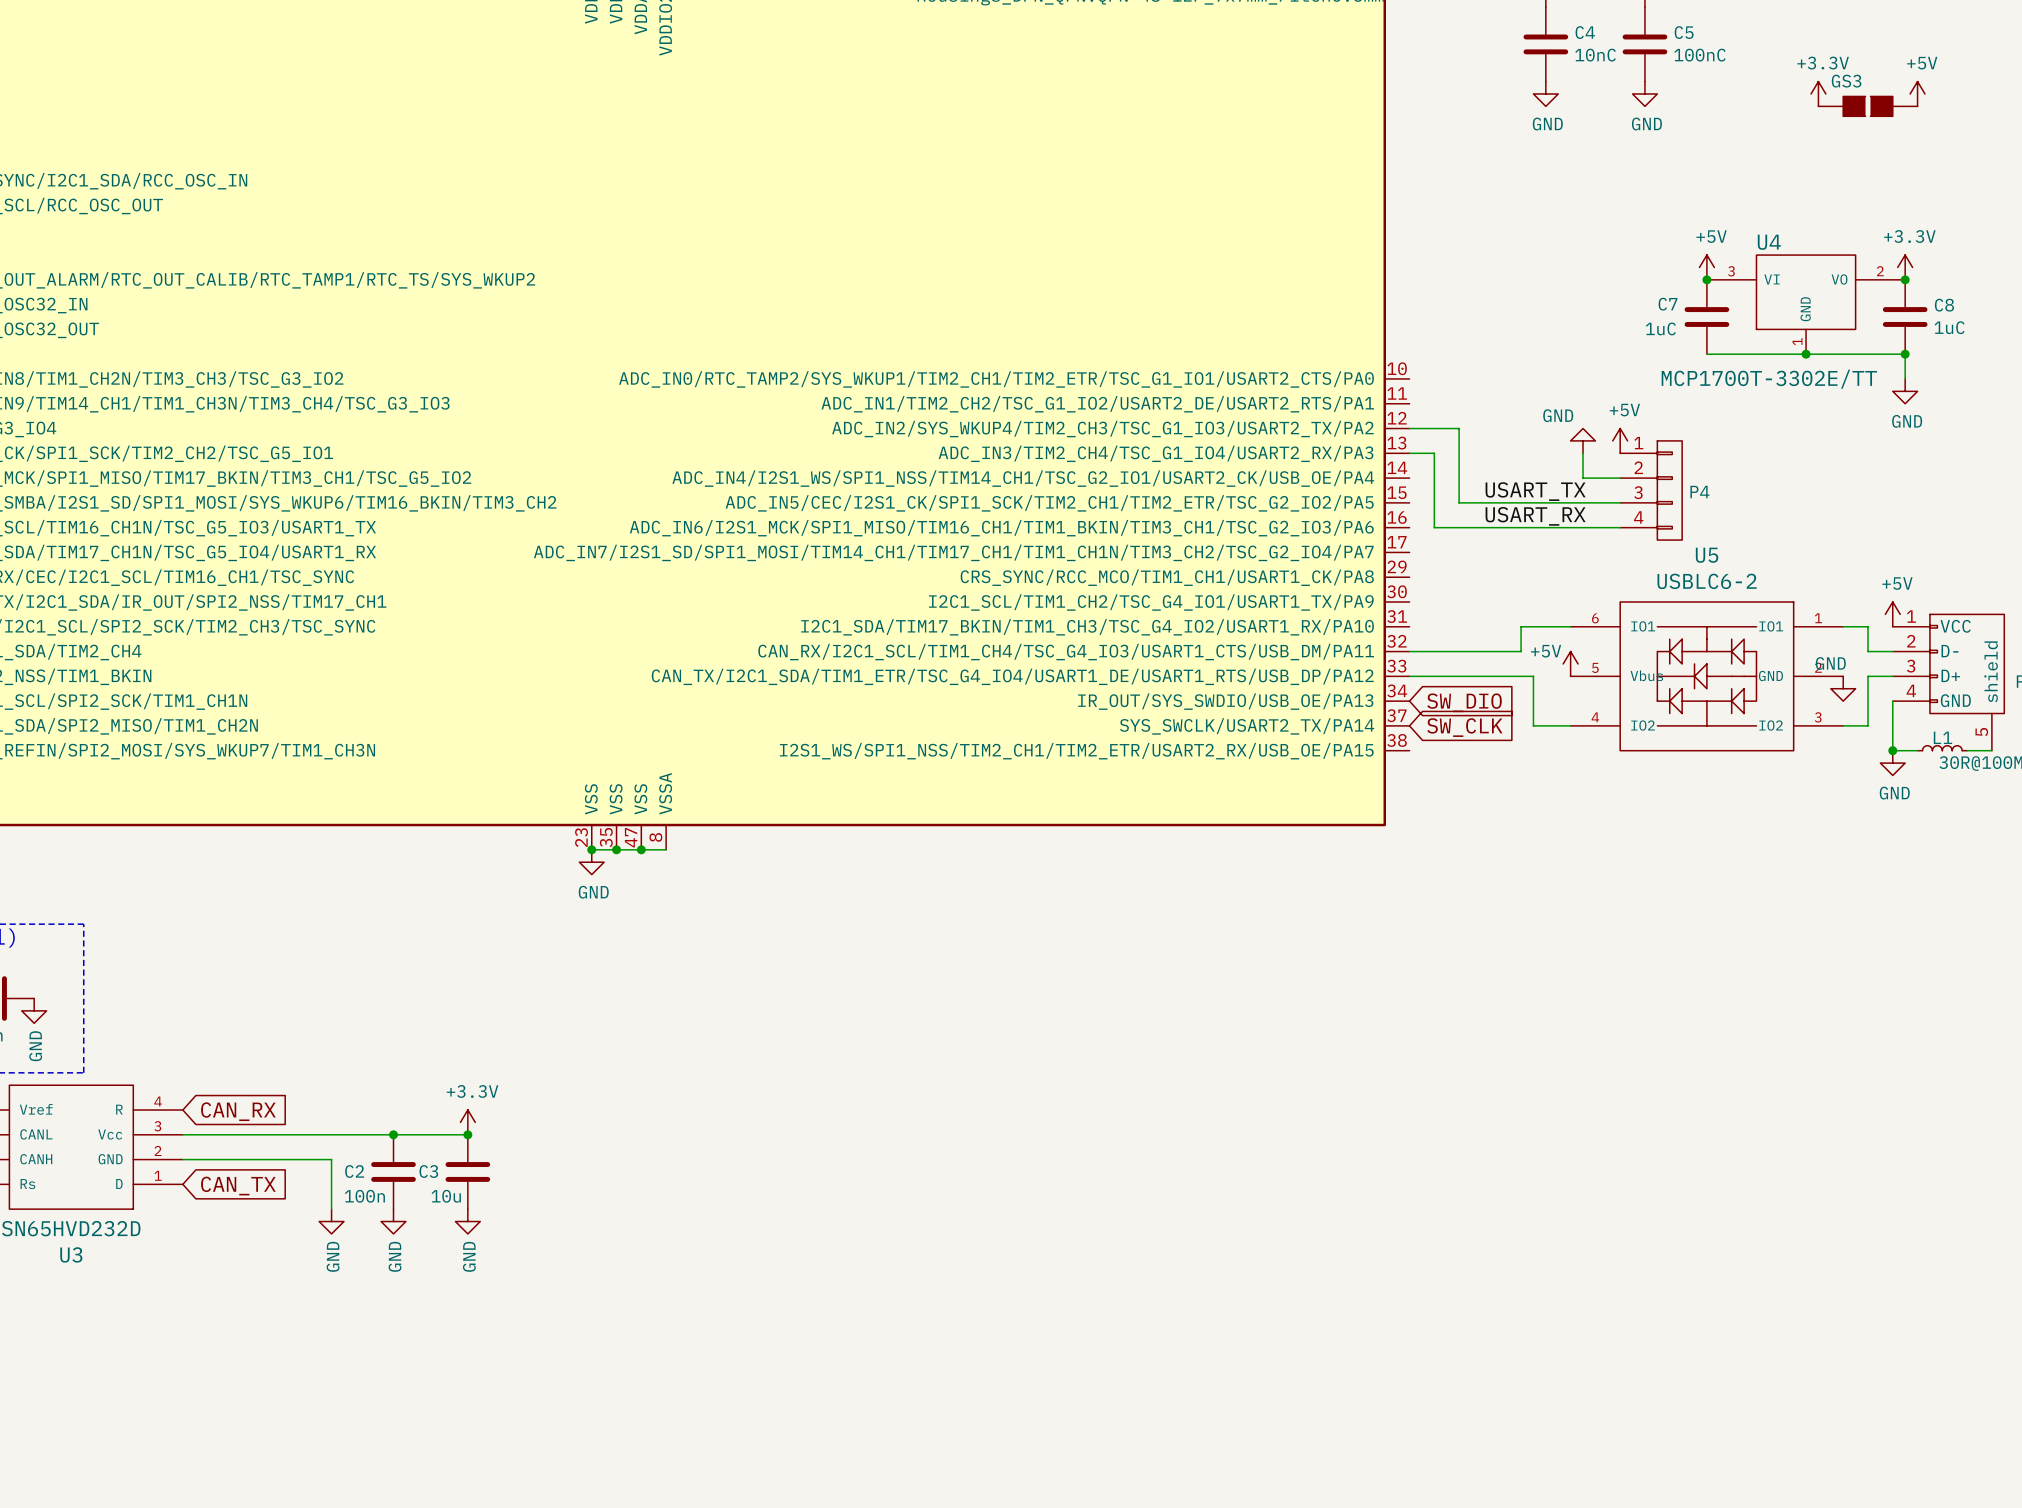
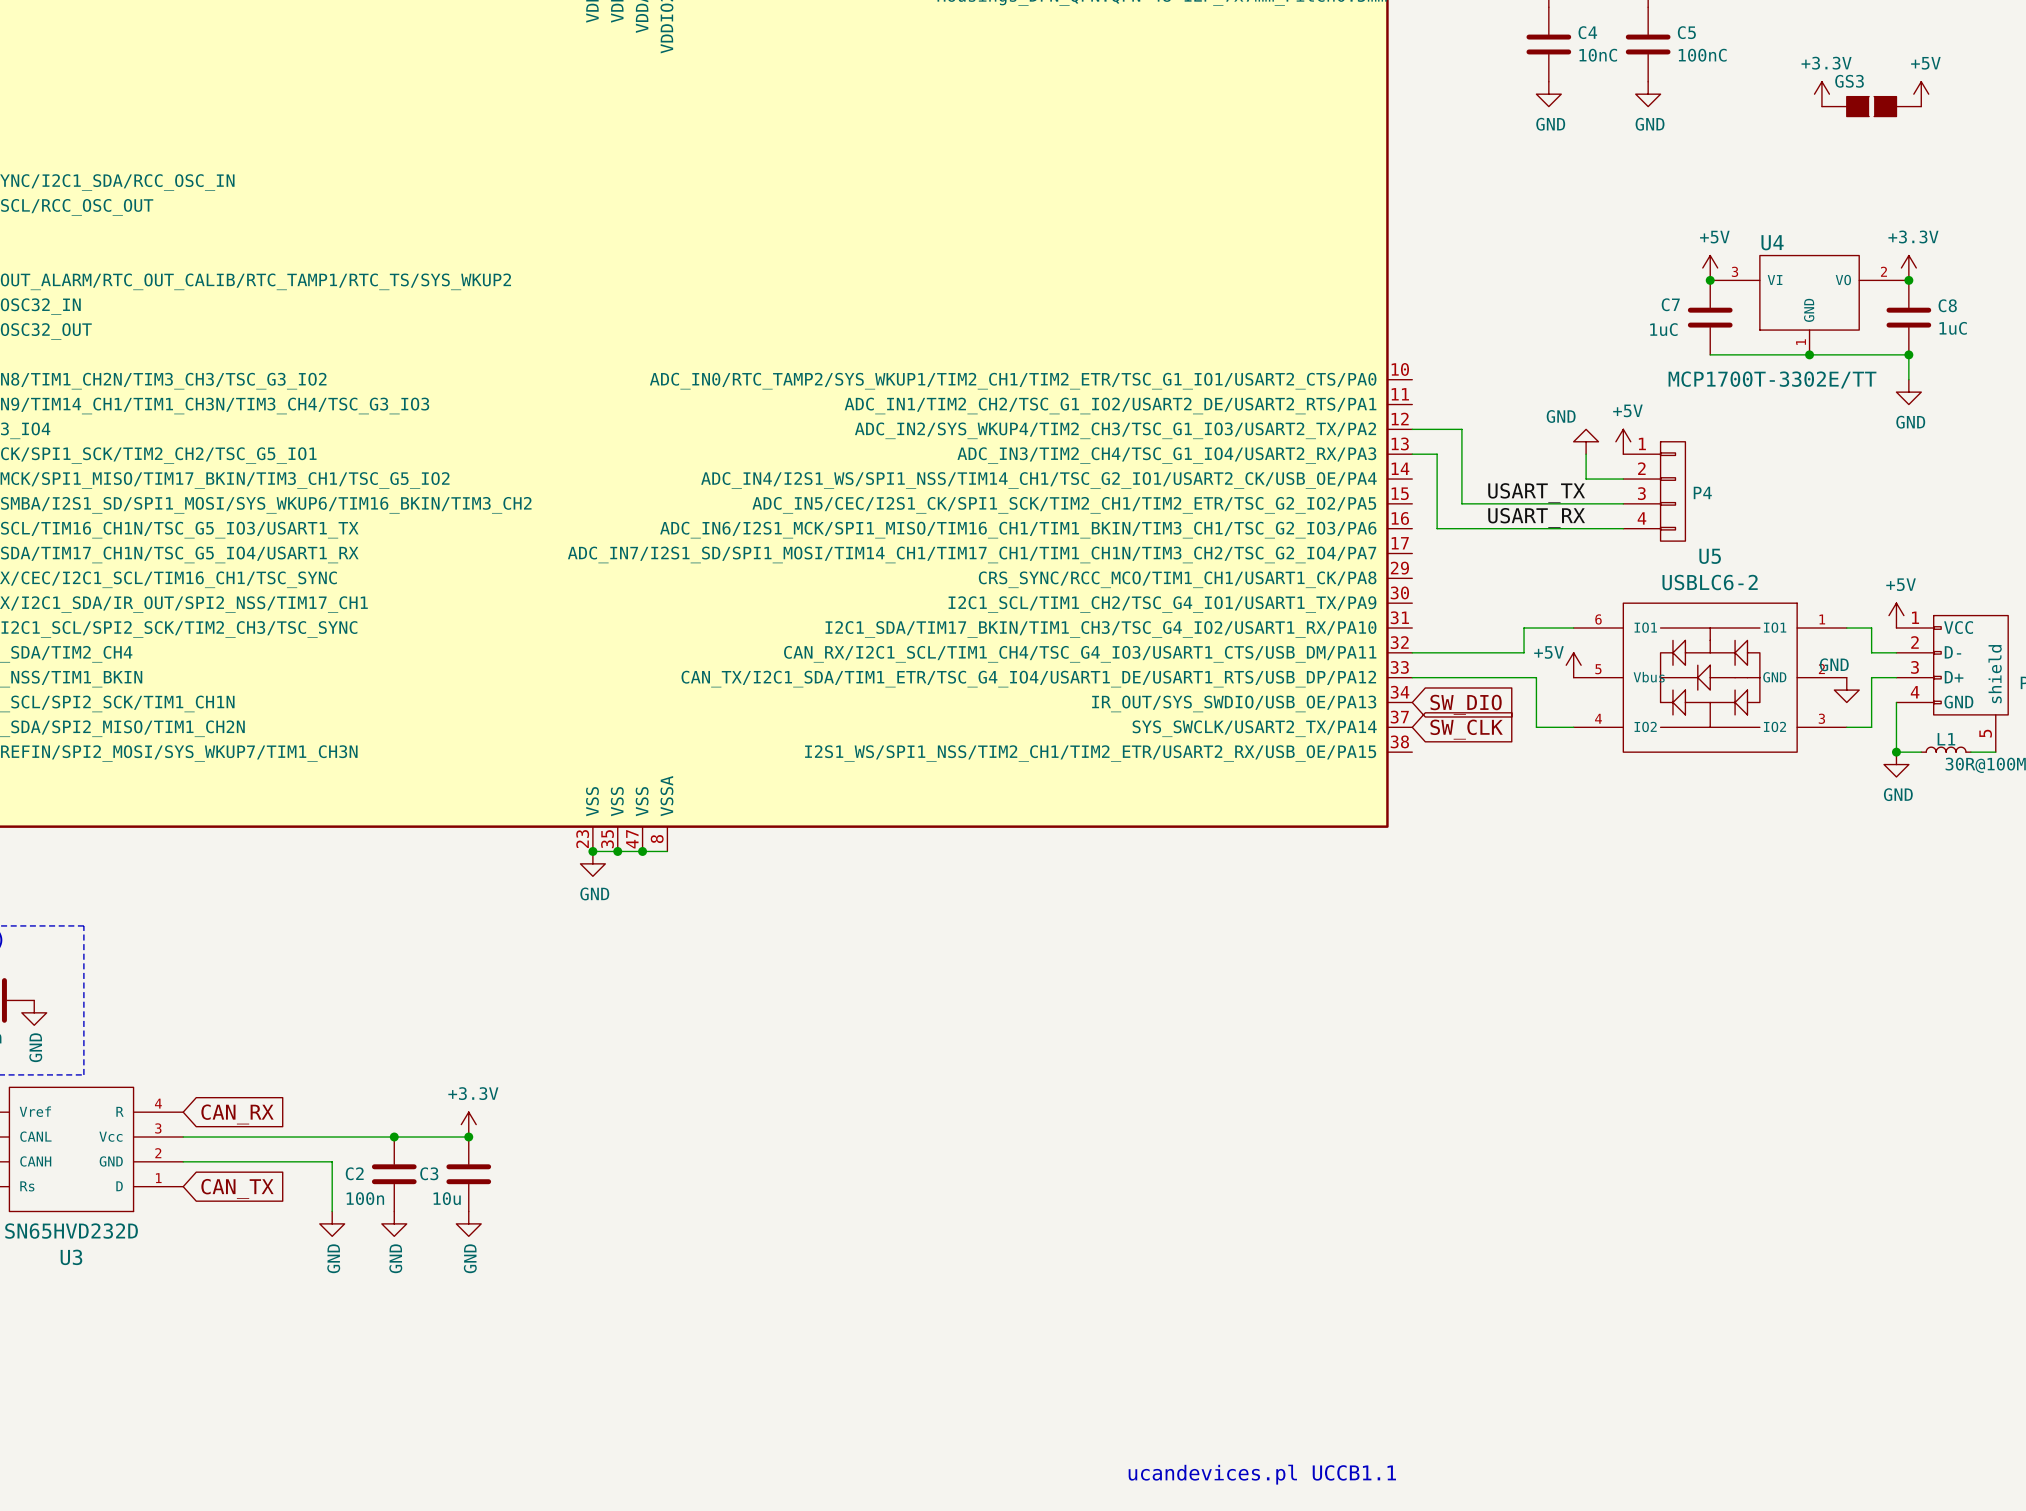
text: none -> ucandevices.pl UCCB1.1 (1262, 1474)

